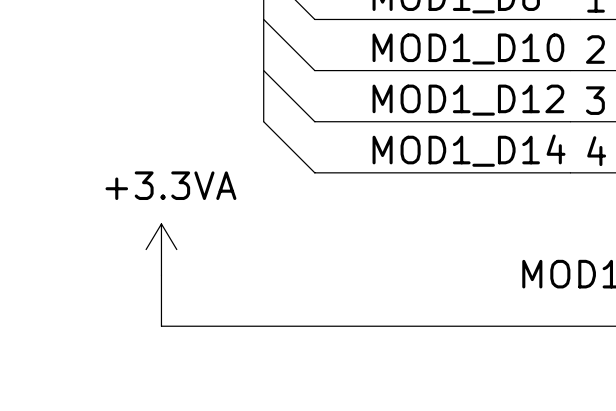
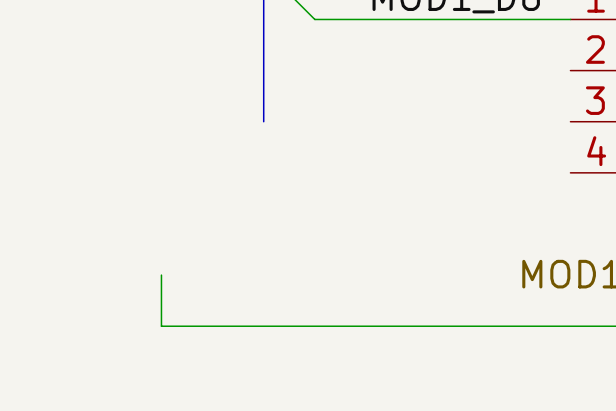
wire: (263, 19) (314, 70) (570, 70) -> none
label: MOD1_D10 (468, 49) -> none
wire: (263, 70) (314, 121) (570, 121) -> none
label: MOD1_D12 (468, 100) -> none
wire: (263, 121) (314, 172) (570, 172) -> none
label: MOD1_D14 (469, 150) -> none
power symbol: +3.3VA (161, 249) -> none

